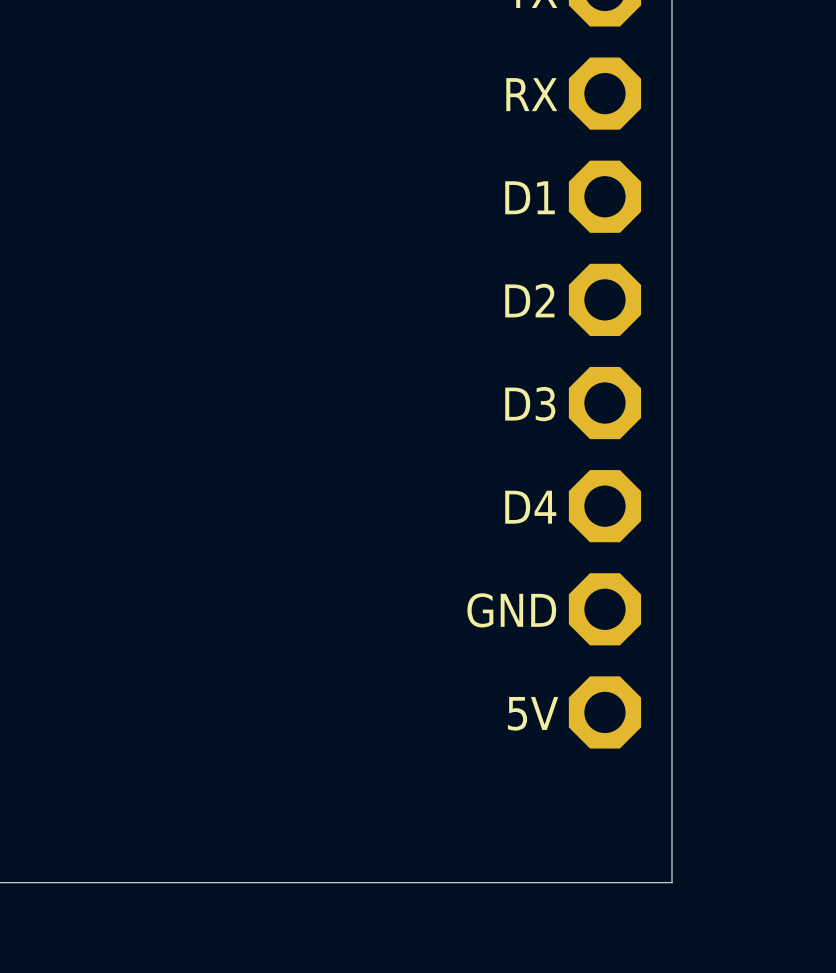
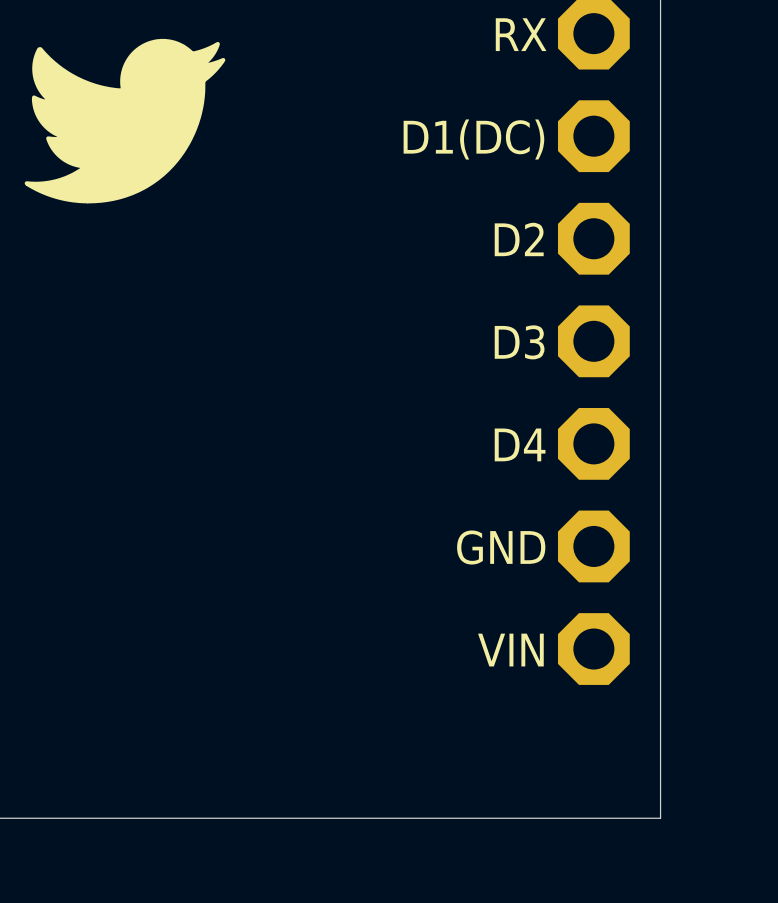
drawing: none -> [24, 38, 226, 204]
text: D1 (530, 197) -> D1(DC) (473, 139)
text: 5V (533, 713) -> VIN (510, 650)

